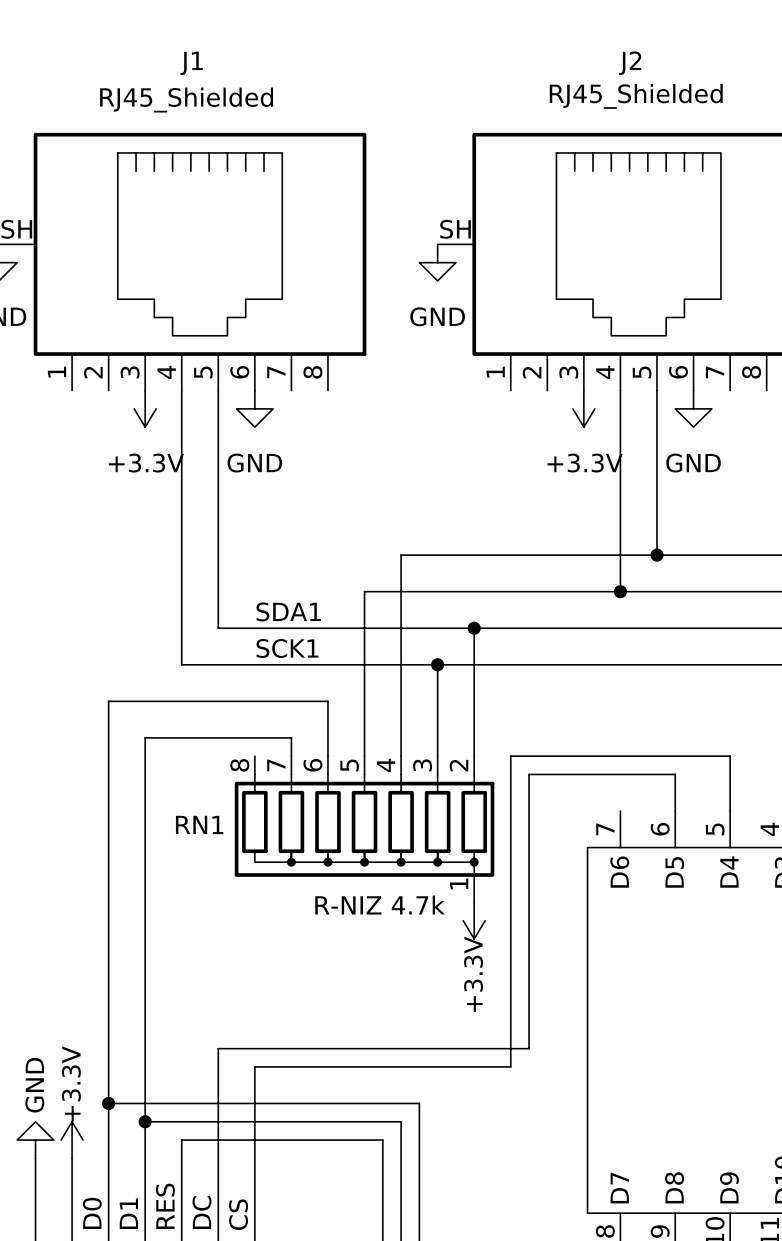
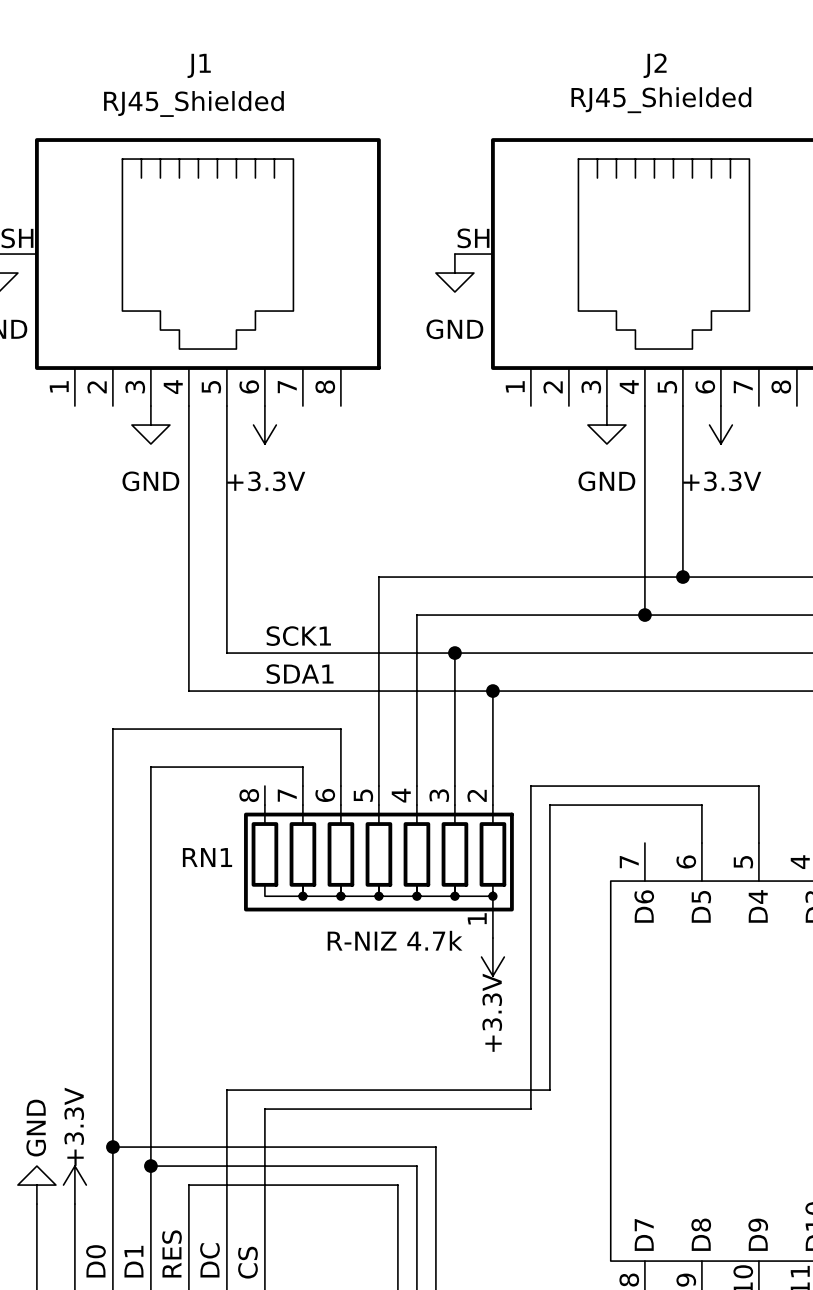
power symbol: +3.3V (145, 408) -> GND (150, 425)
power symbol: GND (254, 408) -> +3.3V (264, 425)
power symbol: +3.3V (583, 408) -> GND (606, 425)
power symbol: GND (693, 408) -> +3.3V (720, 425)
wire: (401, 555) (401, 591) (364, 591) -> (416, 577) (378, 577) (378, 615)
label: SDA1 (288, 611) -> SCK1 (298, 636)
junction: none -> (454, 653)
wire: (474, 628) (474, 664) -> (454, 653) (454, 691)
junction: (474, 628) -> none
label: SCK1 (287, 648) -> SDA1 (300, 674)
junction: (437, 664) -> none
junction: none -> (492, 691)

